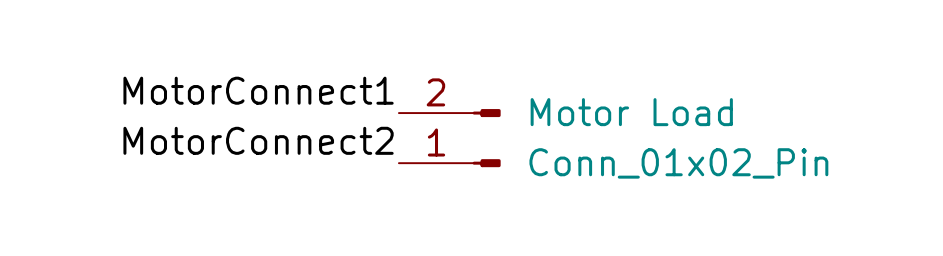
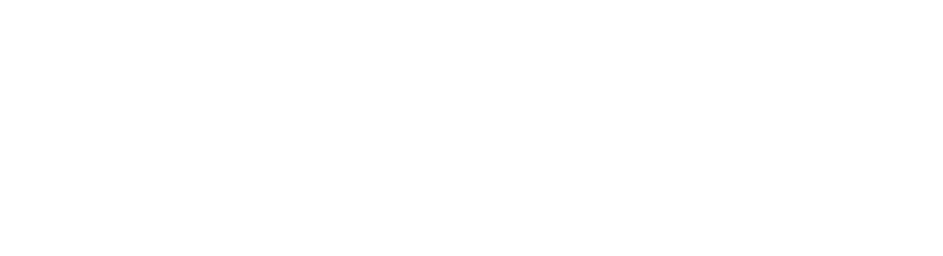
label: MotorConnect1 (258, 90) -> none
Motor Load: Conn_01x02_Pin (449, 138) -> none
label: MotorConnect2 (258, 140) -> none

